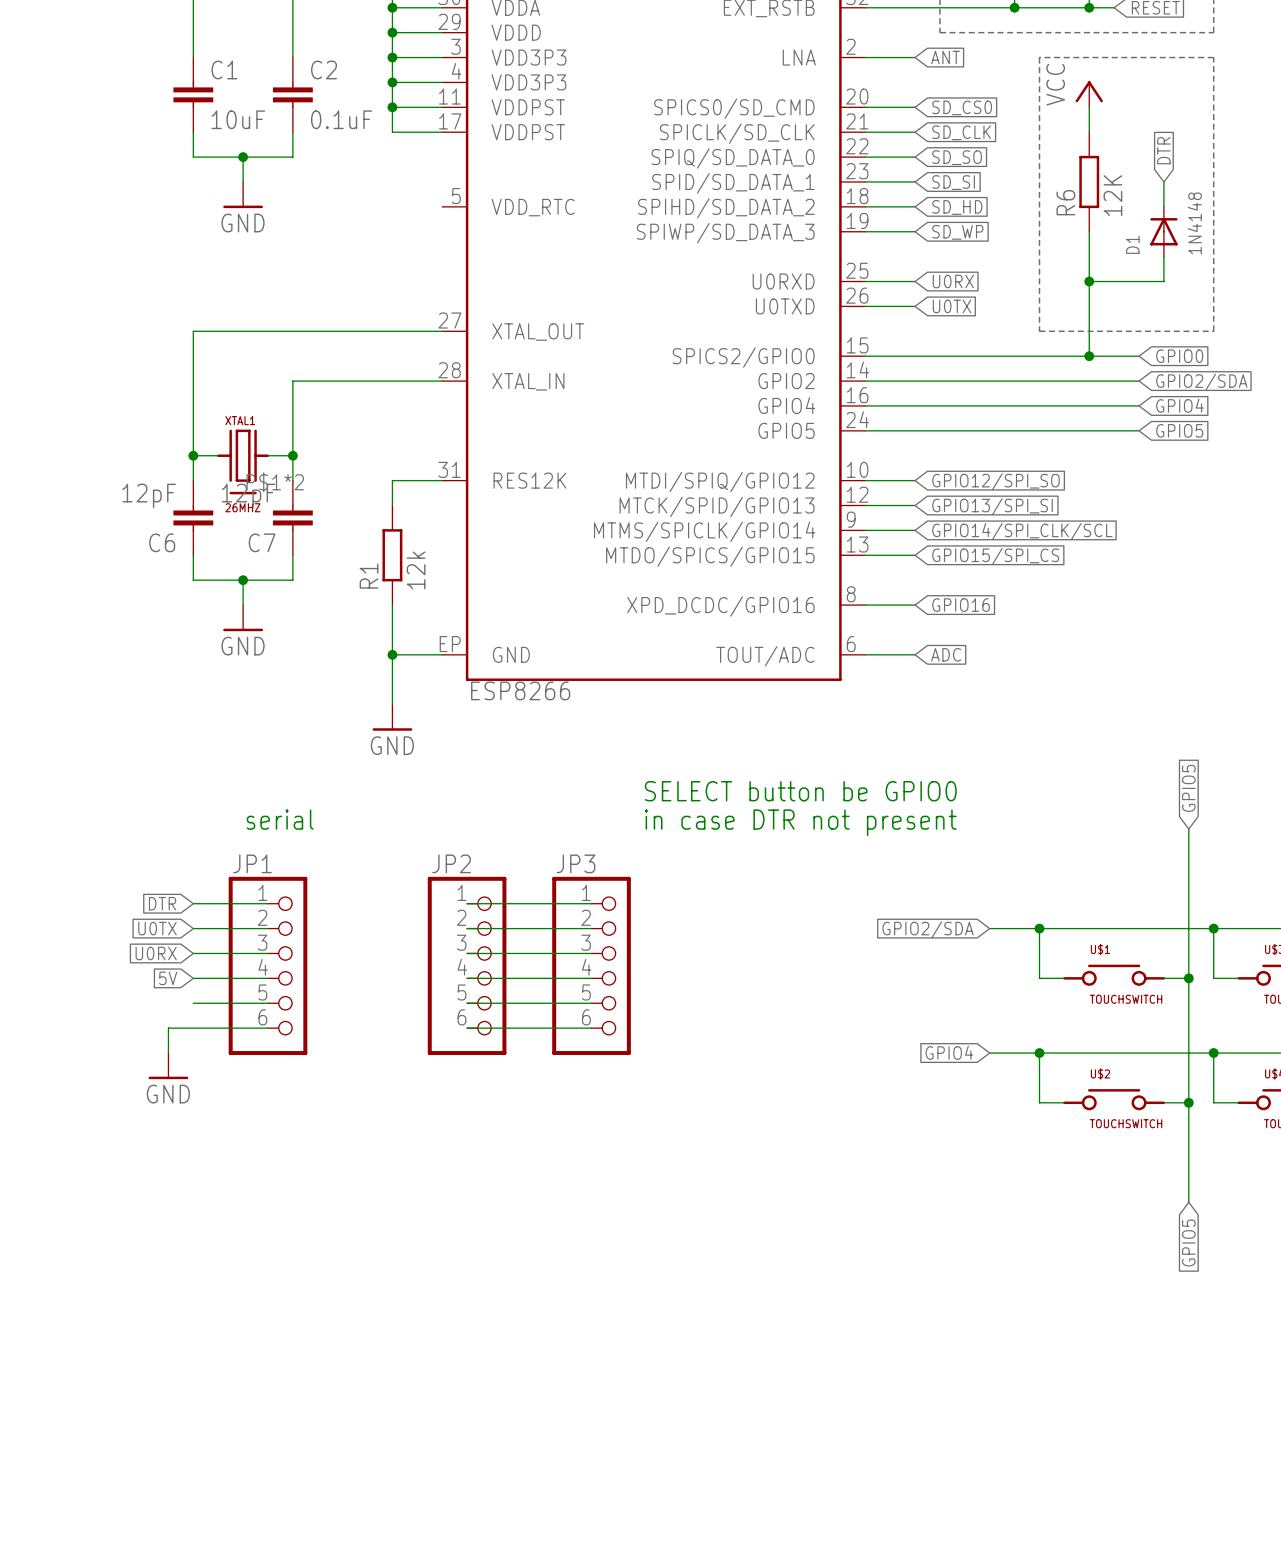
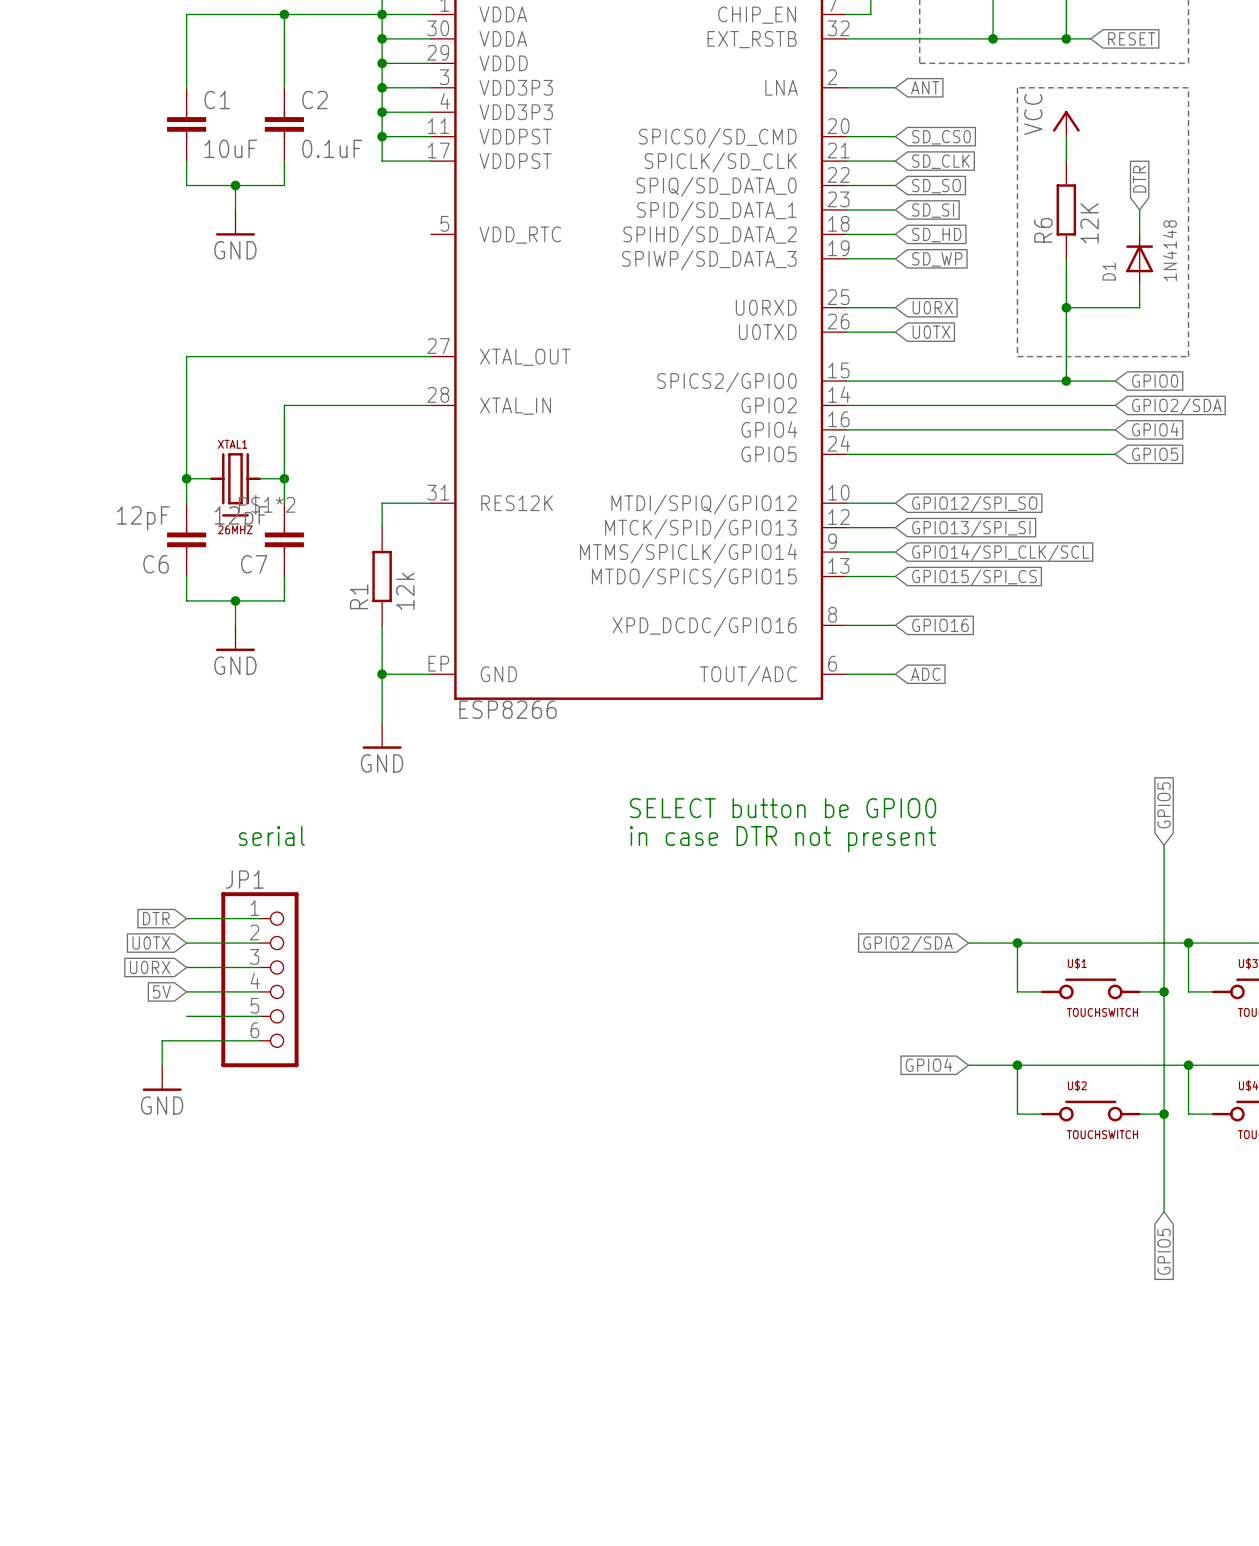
wire: (467, 903) (591, 903) -> none
wire: (467, 928) (591, 928) -> none
wire: (467, 953) (591, 953) -> none
JP2: (467, 965) -> none
JP3: (591, 965) -> none
wire: (467, 978) (591, 978) -> none
wire: (467, 1003) (591, 1003) -> none
wire: (467, 1028) (591, 1028) -> none

